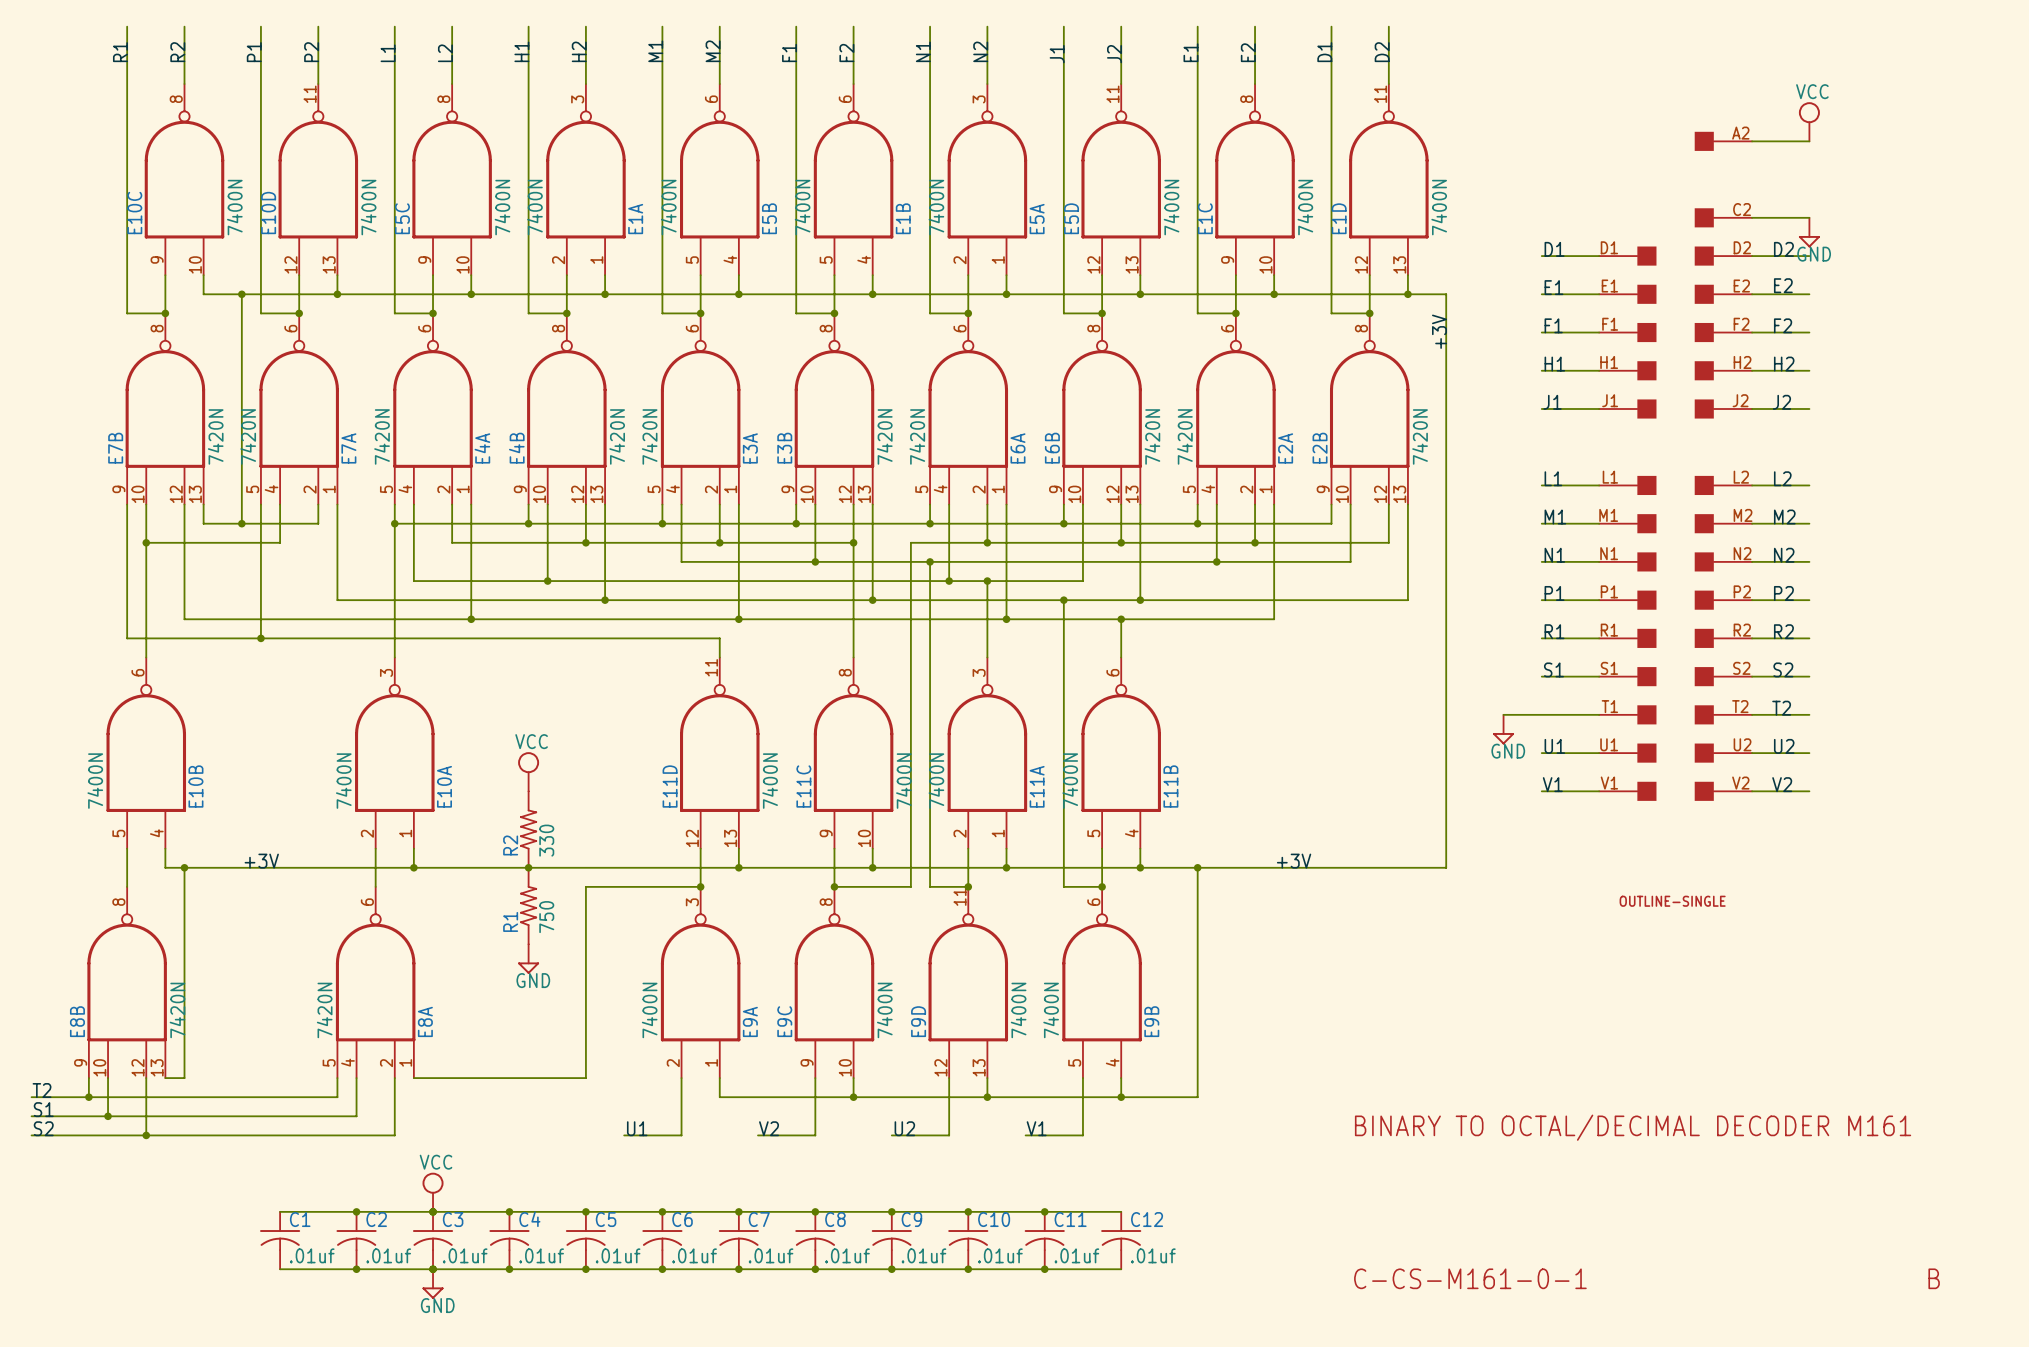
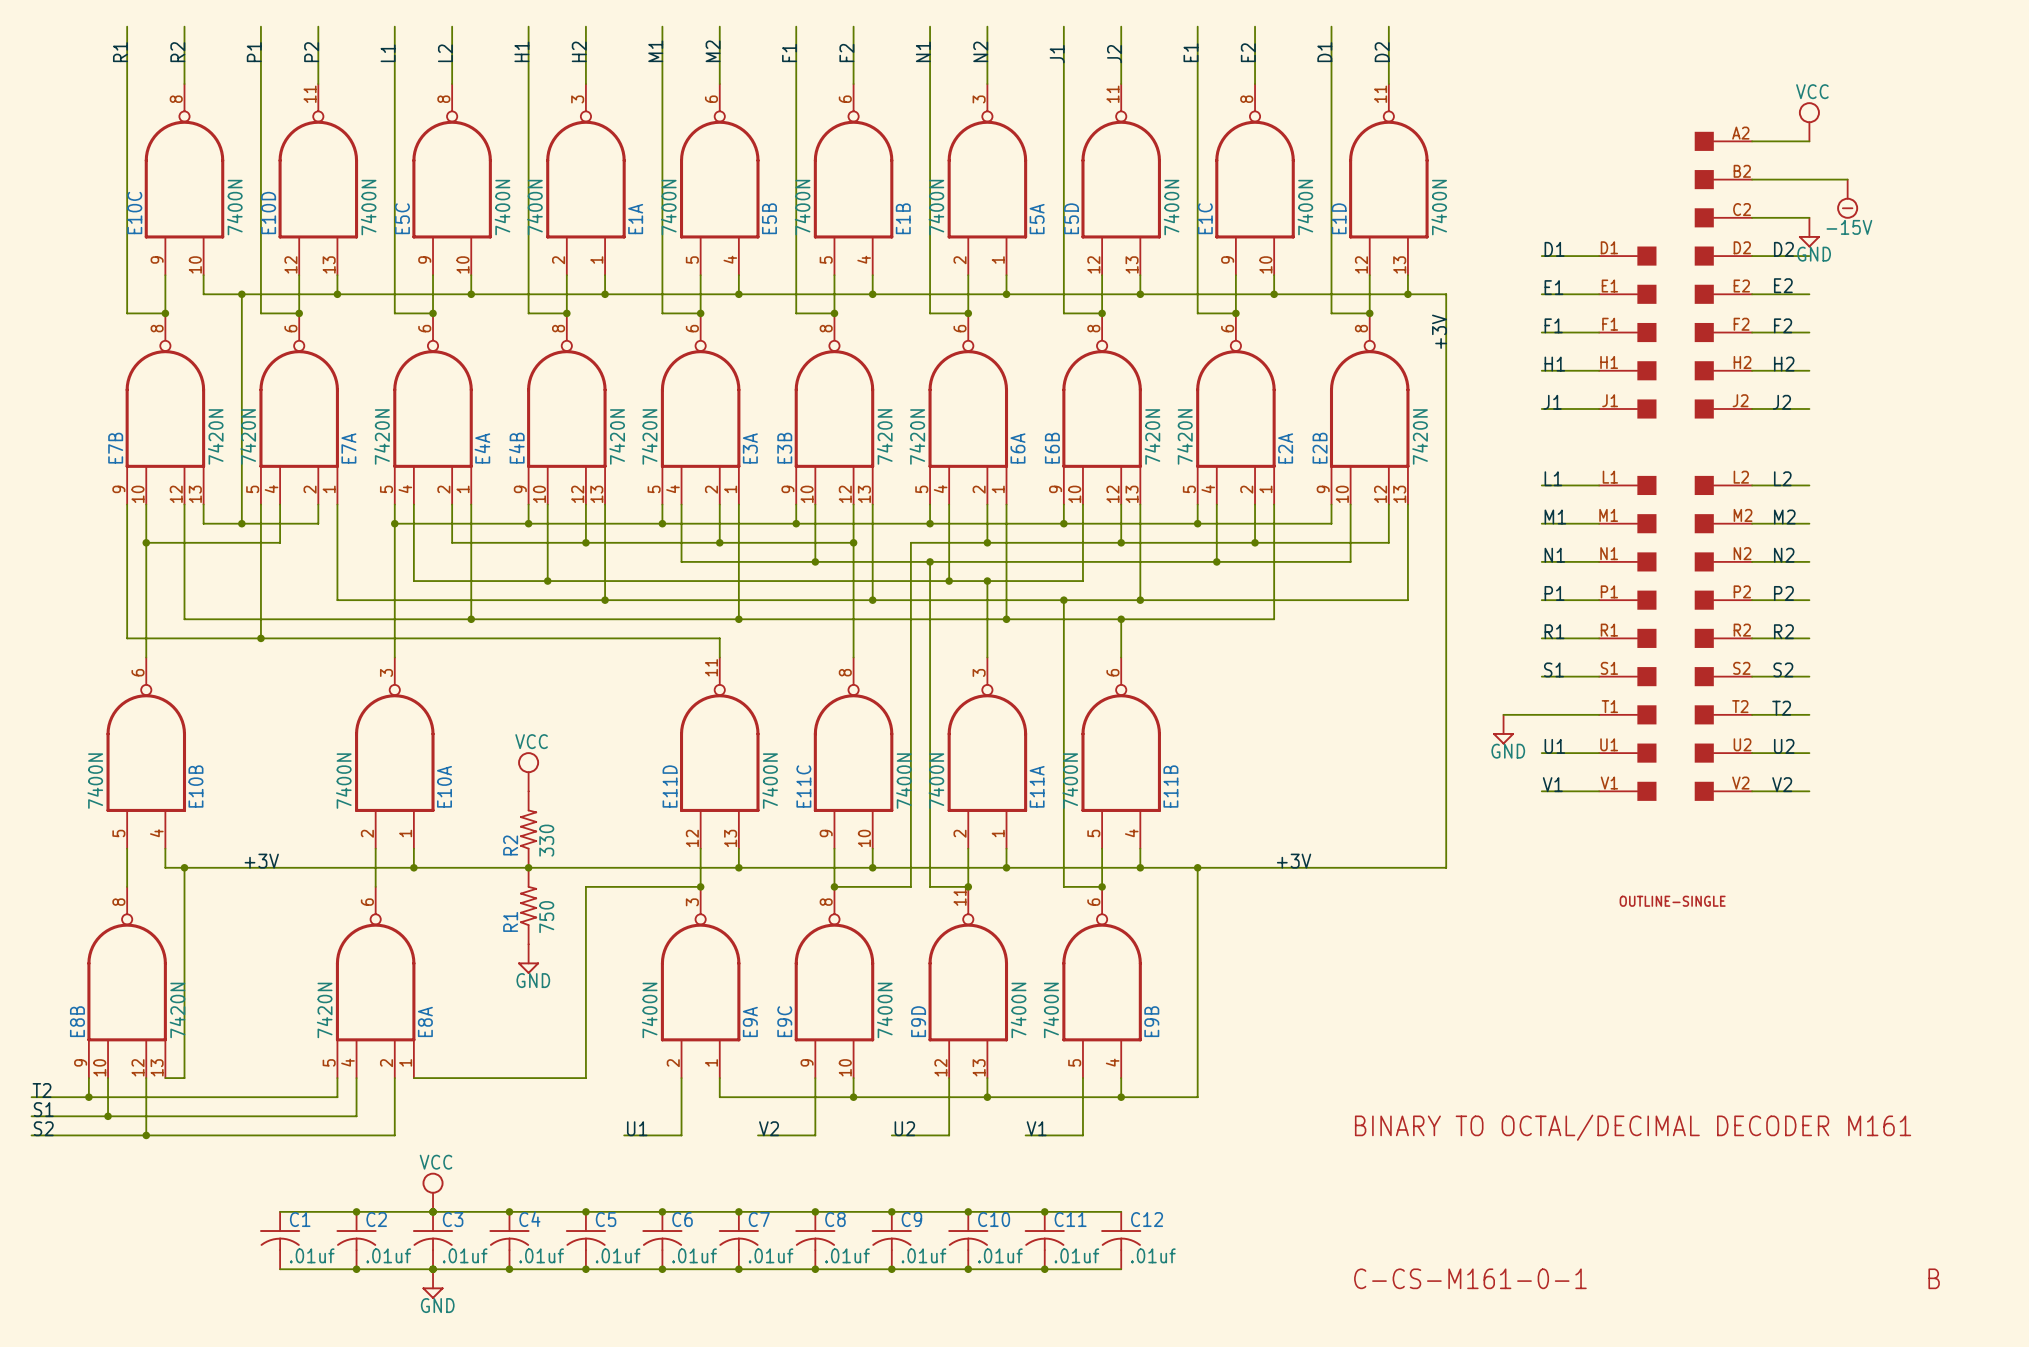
part: none -> (1723, 179)
wire: none -> (1752, 179) (1847, 179)
power symbol: none -> -15V (1847, 199)

